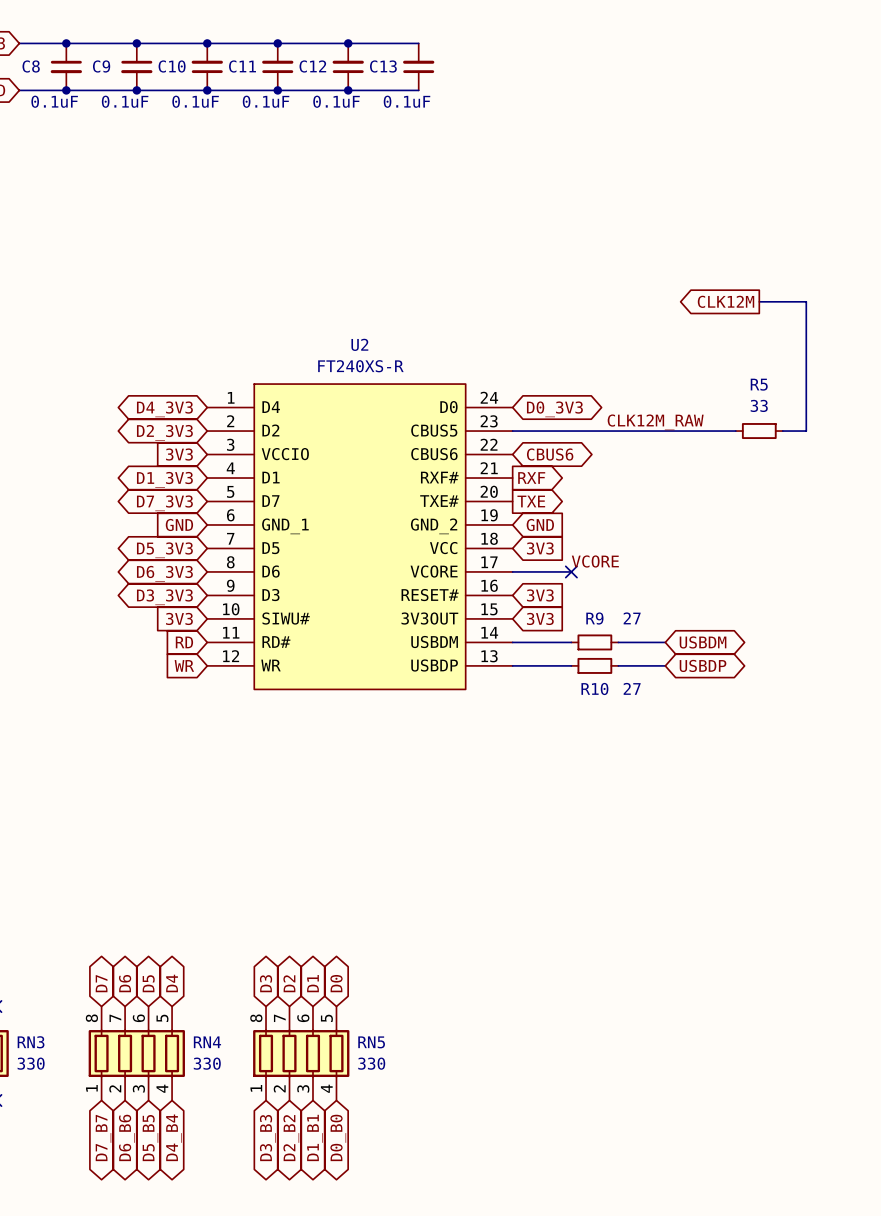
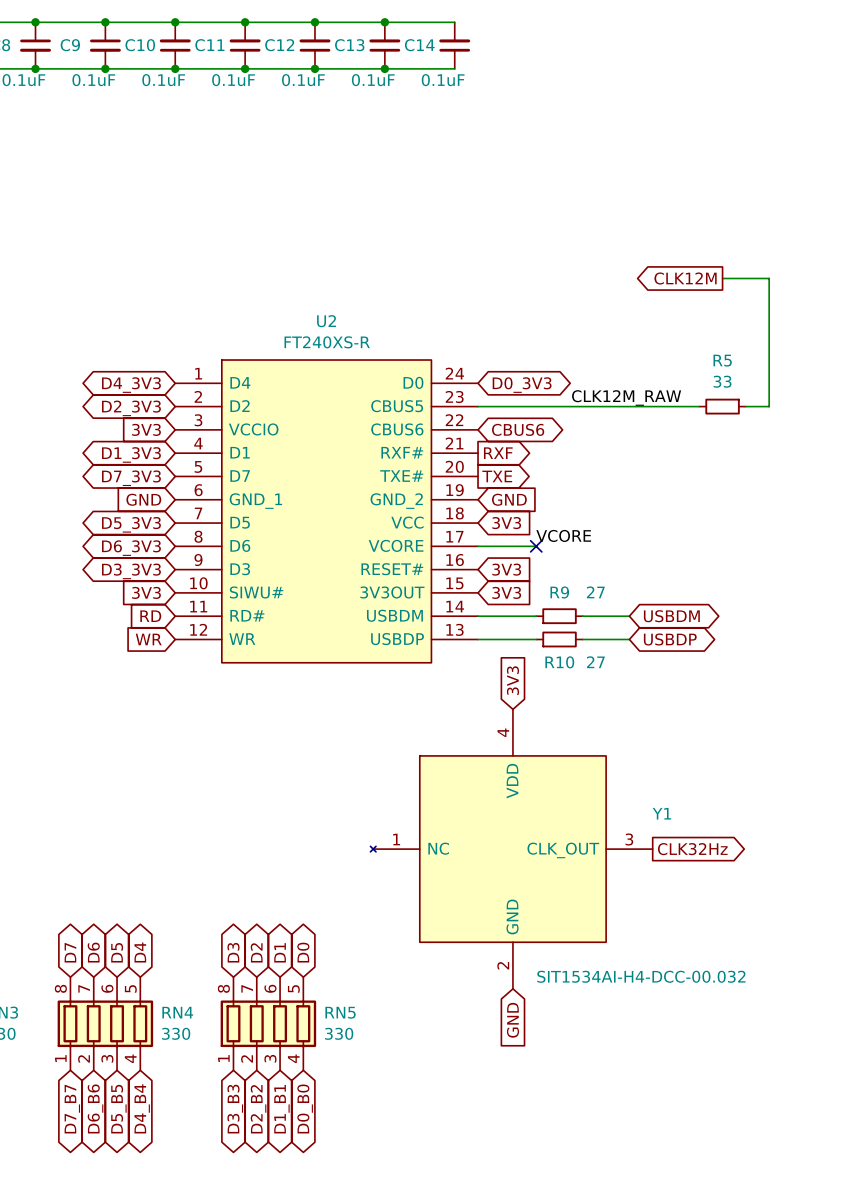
wire: none -> (384, 22) (454, 22)
junction: none -> (384, 22)
C14: none -> 0.1uF (454, 45)
wire: none -> (384, 68) (454, 68)
junction: none -> (384, 68)
global label: none -> 3V3 (512, 680)
Y1: none -> SIT1534AI-H4-DCC-00.032 (511, 849)
global label: none -> CLK32Hz (692, 849)
global label: none -> GND (512, 1020)

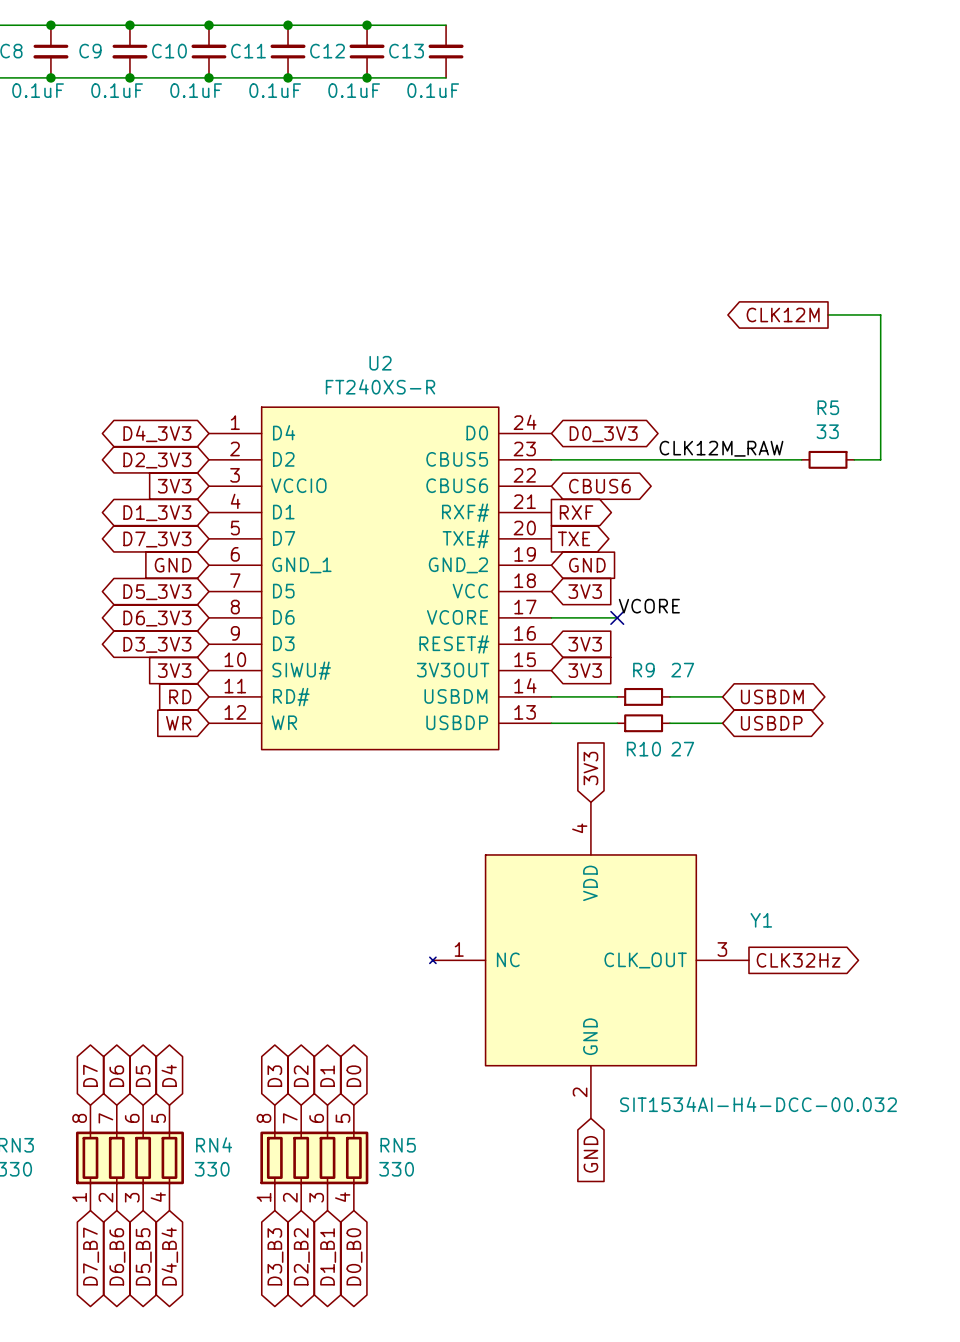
wire: (384, 22) (454, 22) -> none
junction: (384, 22) -> none
C14: 0.1uF (454, 45) -> none
wire: (384, 68) (454, 68) -> none
junction: (384, 68) -> none

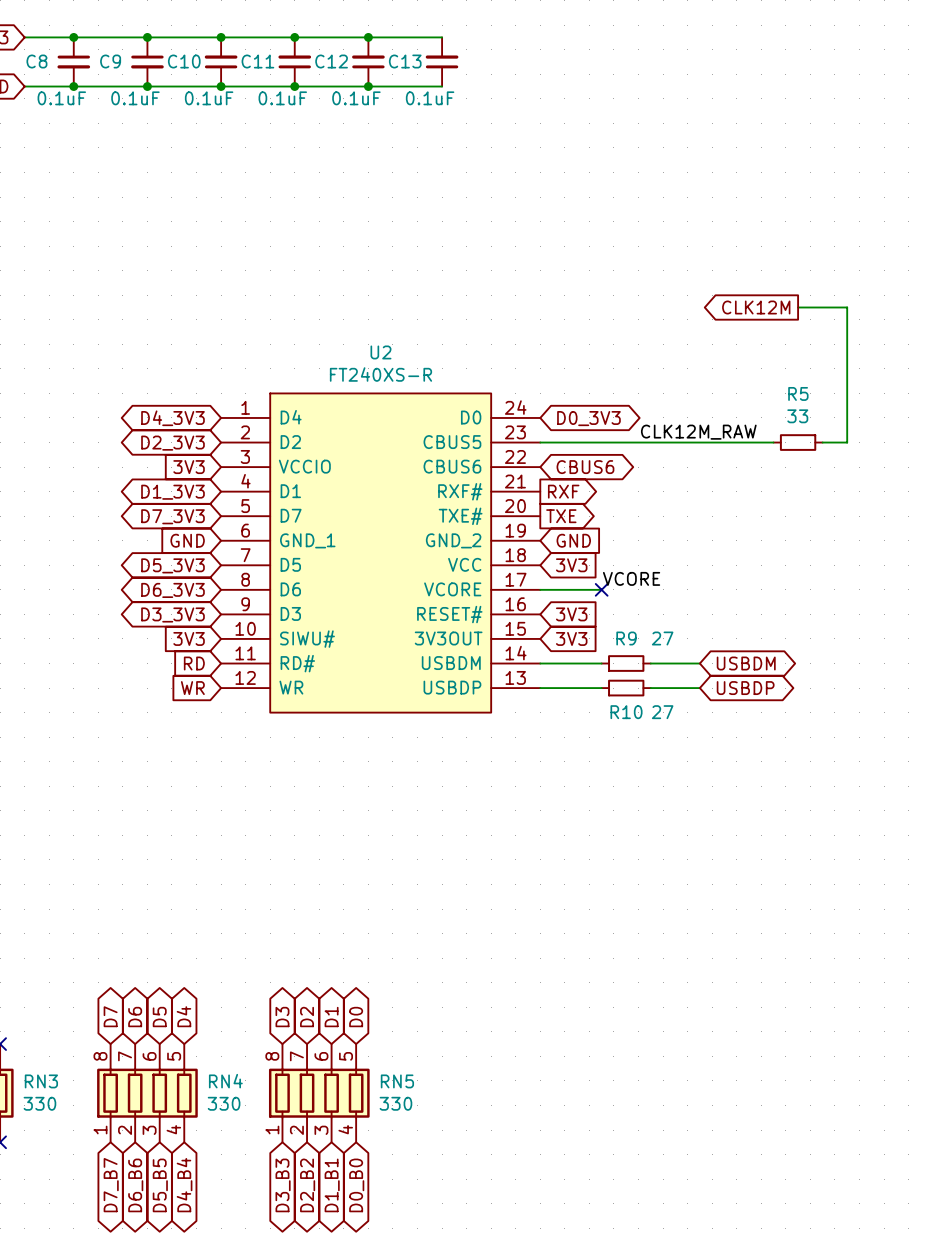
global label: 3V3 (590, 768) -> none
Y1: SIT1534AI-H4-DCC-00.032 (589, 960) -> none
global label: CLK32Hz (798, 960) -> none
global label: GND (590, 1154) -> none

